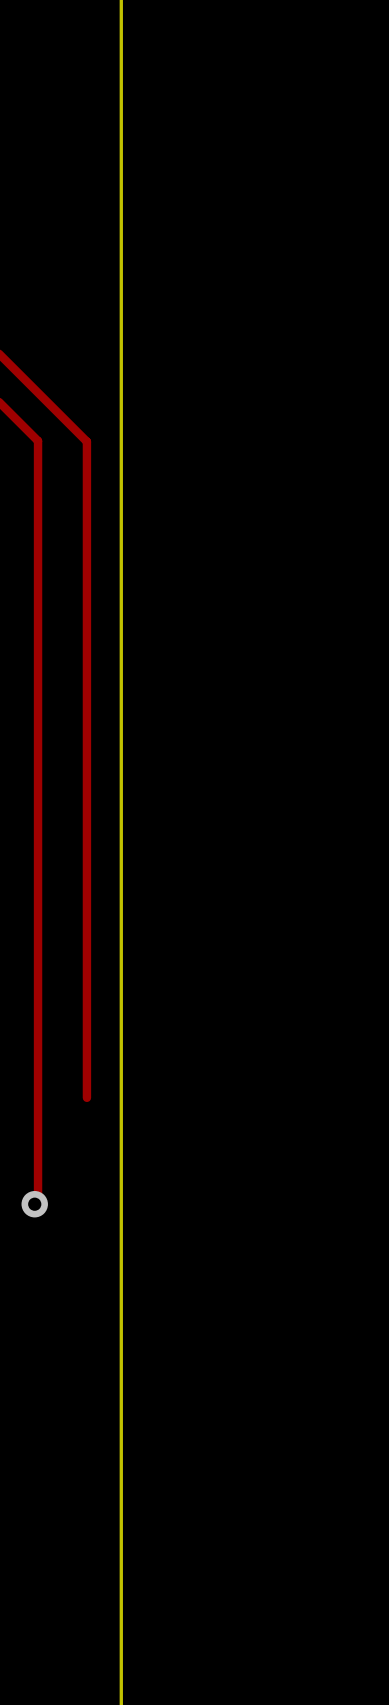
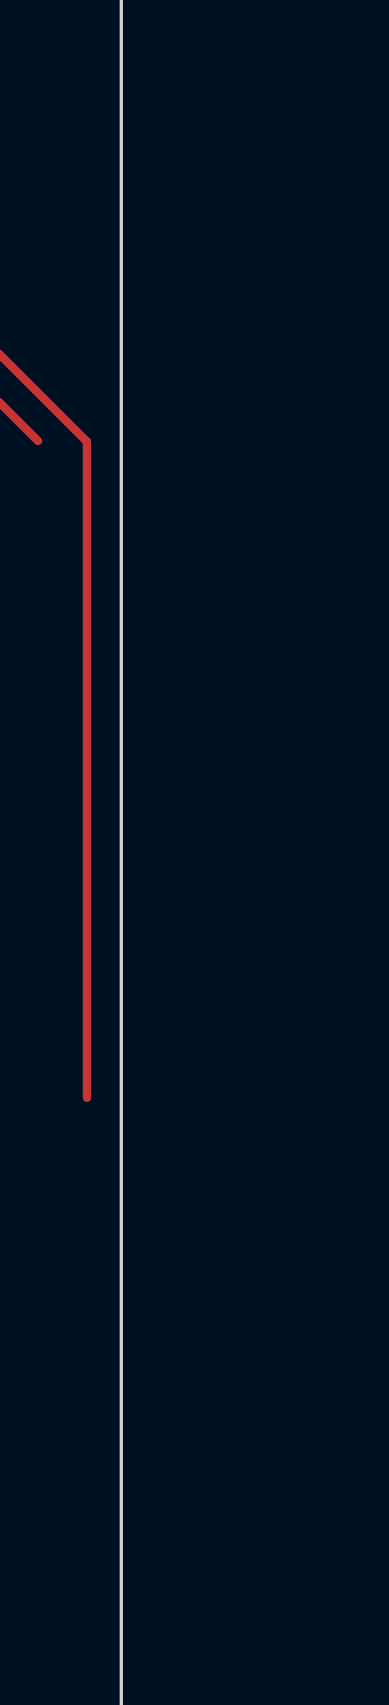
top track: (38, 441) (38, 1200) (34, 1204) -> none
via: (34, 1204) -> none

